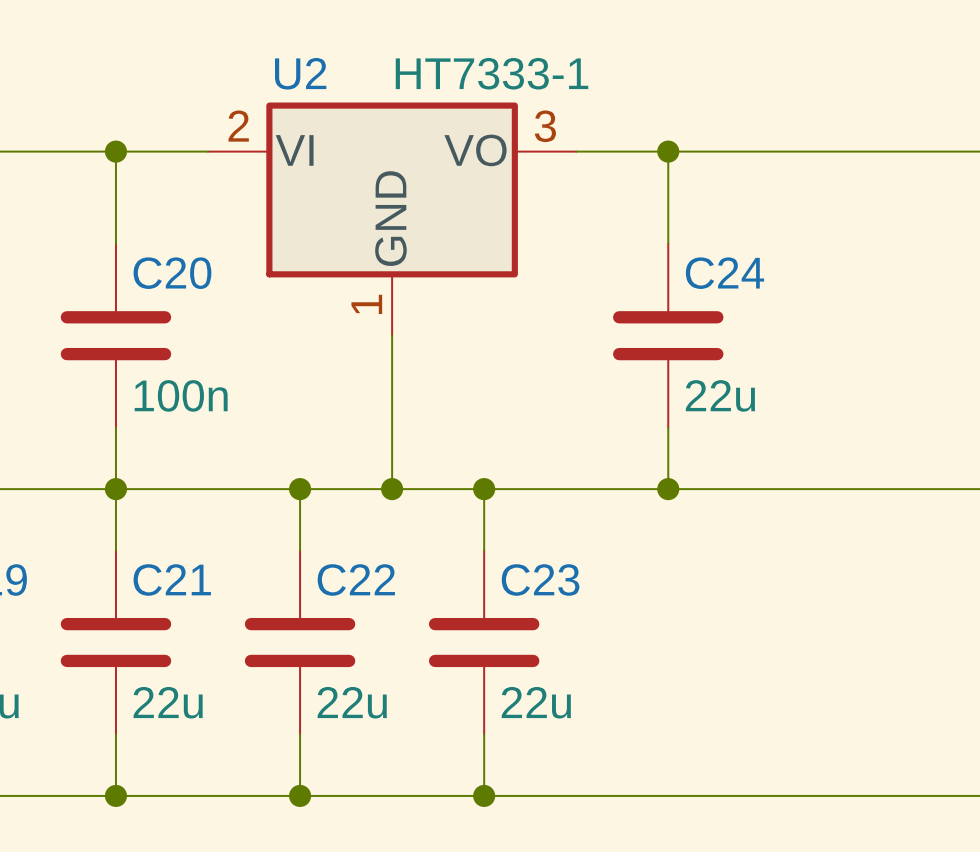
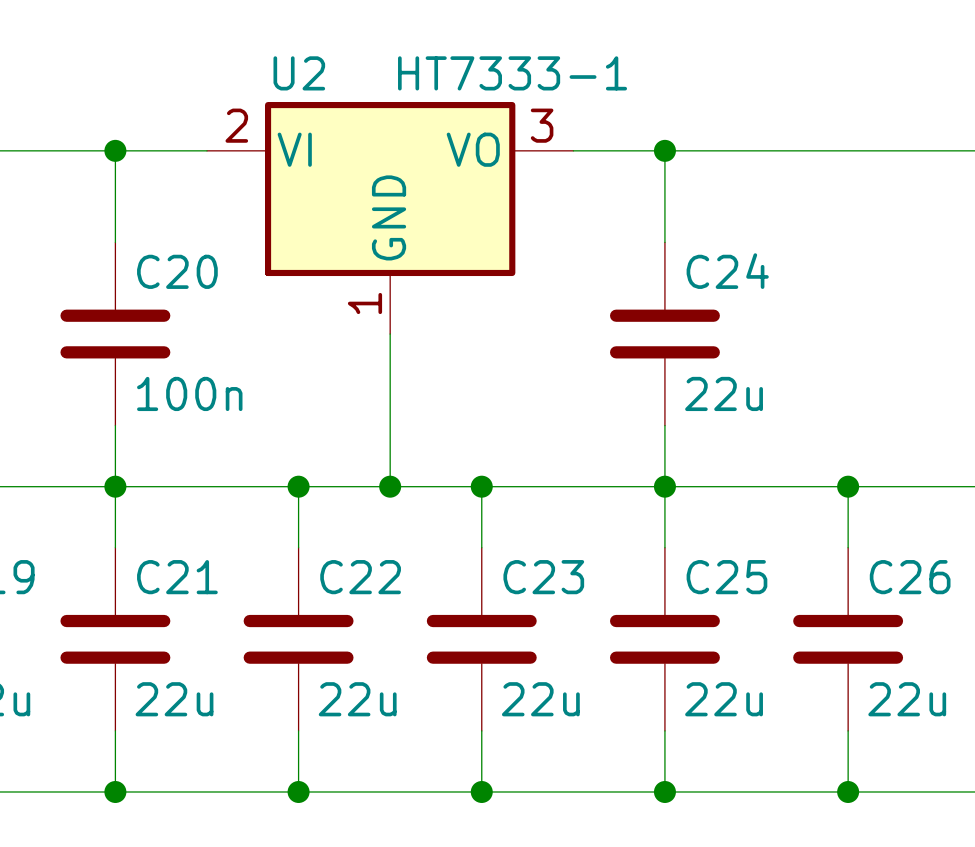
wire: none -> (664, 486) (664, 547)
wire: none -> (848, 486) (848, 547)
junction: none -> (848, 486)
C25: none -> 22u (664, 639)
C26: none -> 22u (848, 639)
wire: none -> (664, 730) (664, 791)
wire: none -> (848, 730) (848, 791)
junction: none -> (664, 791)
junction: none -> (848, 791)

